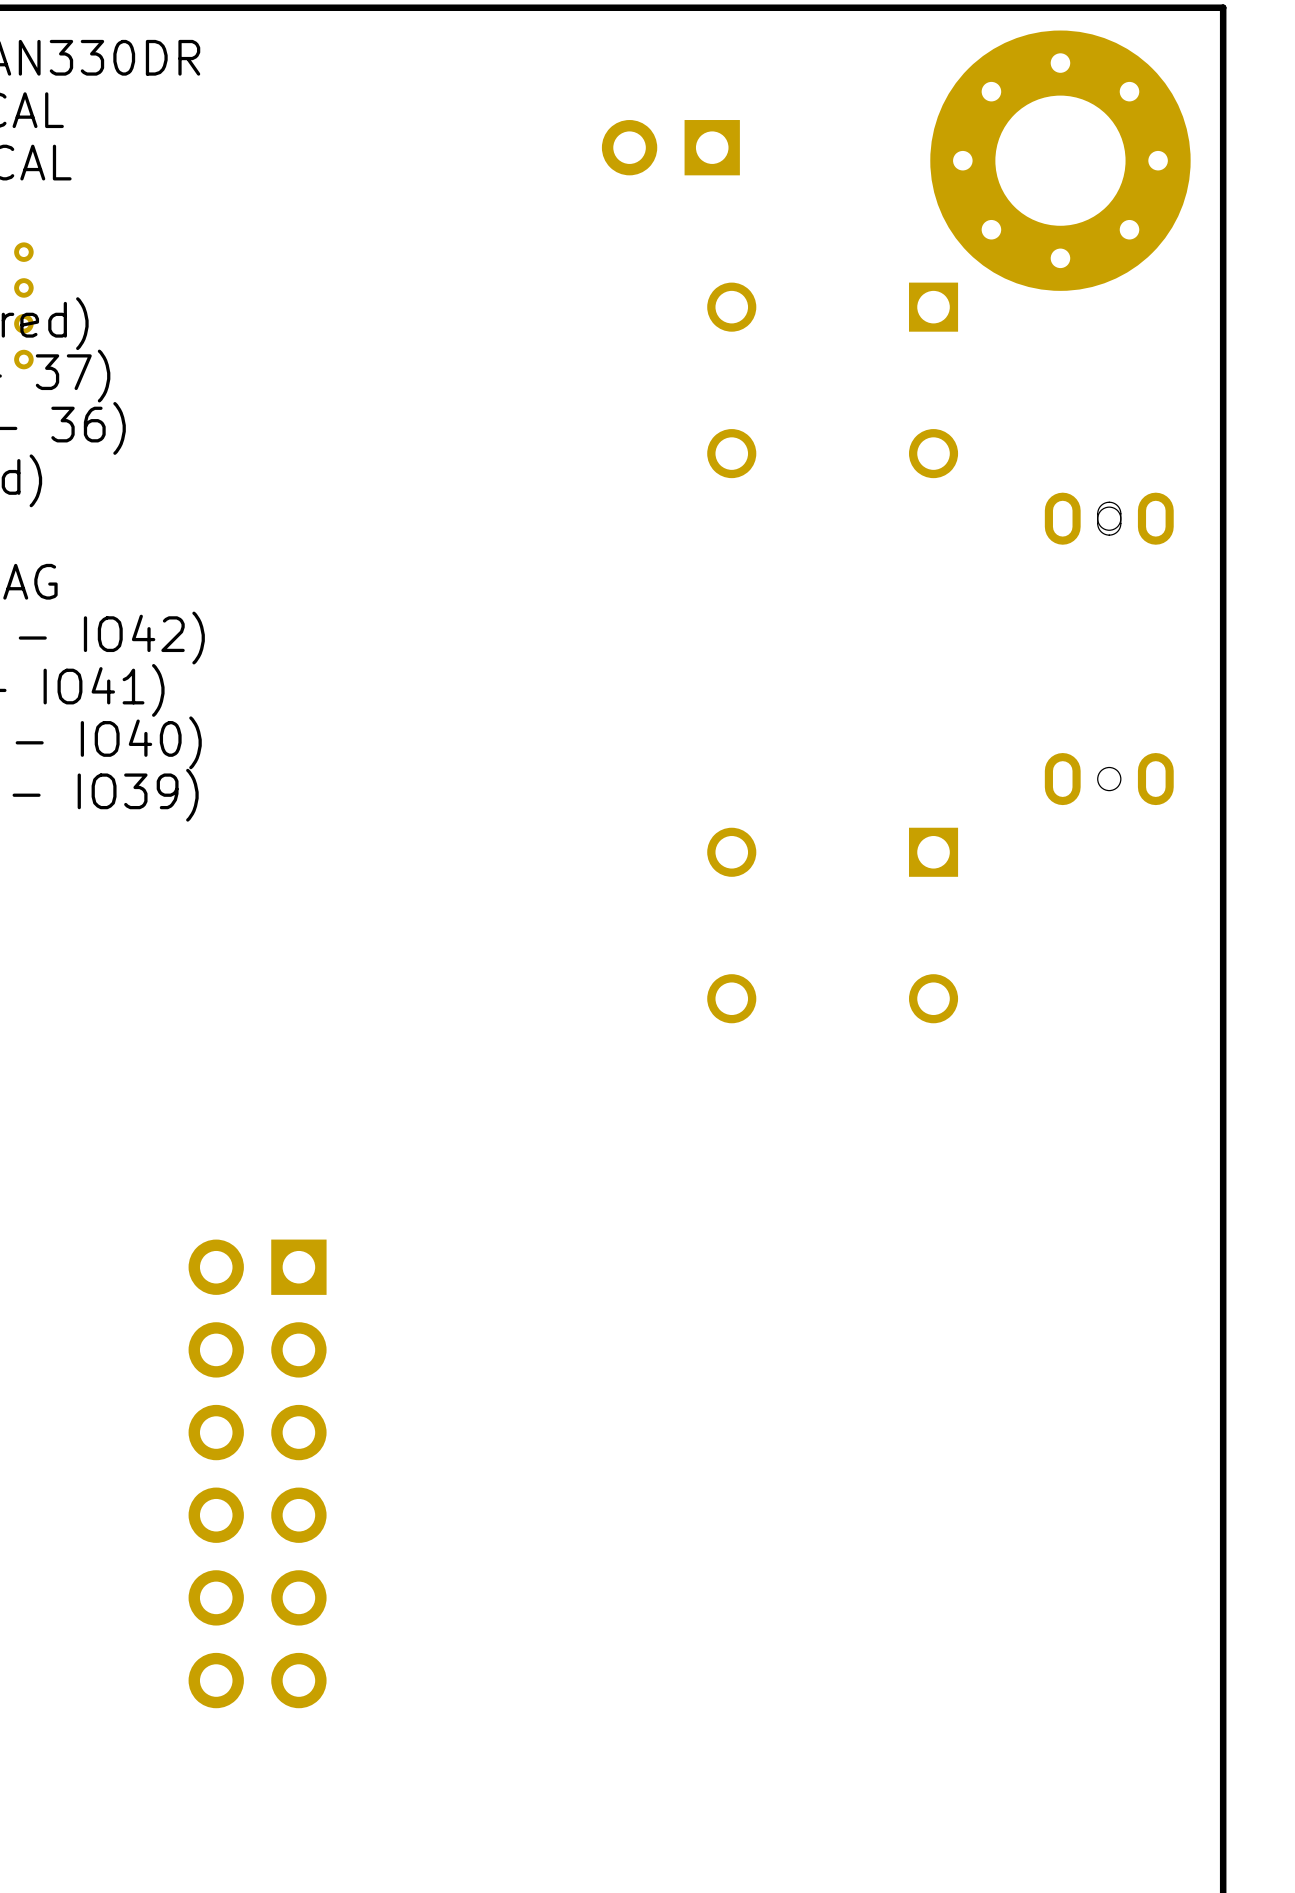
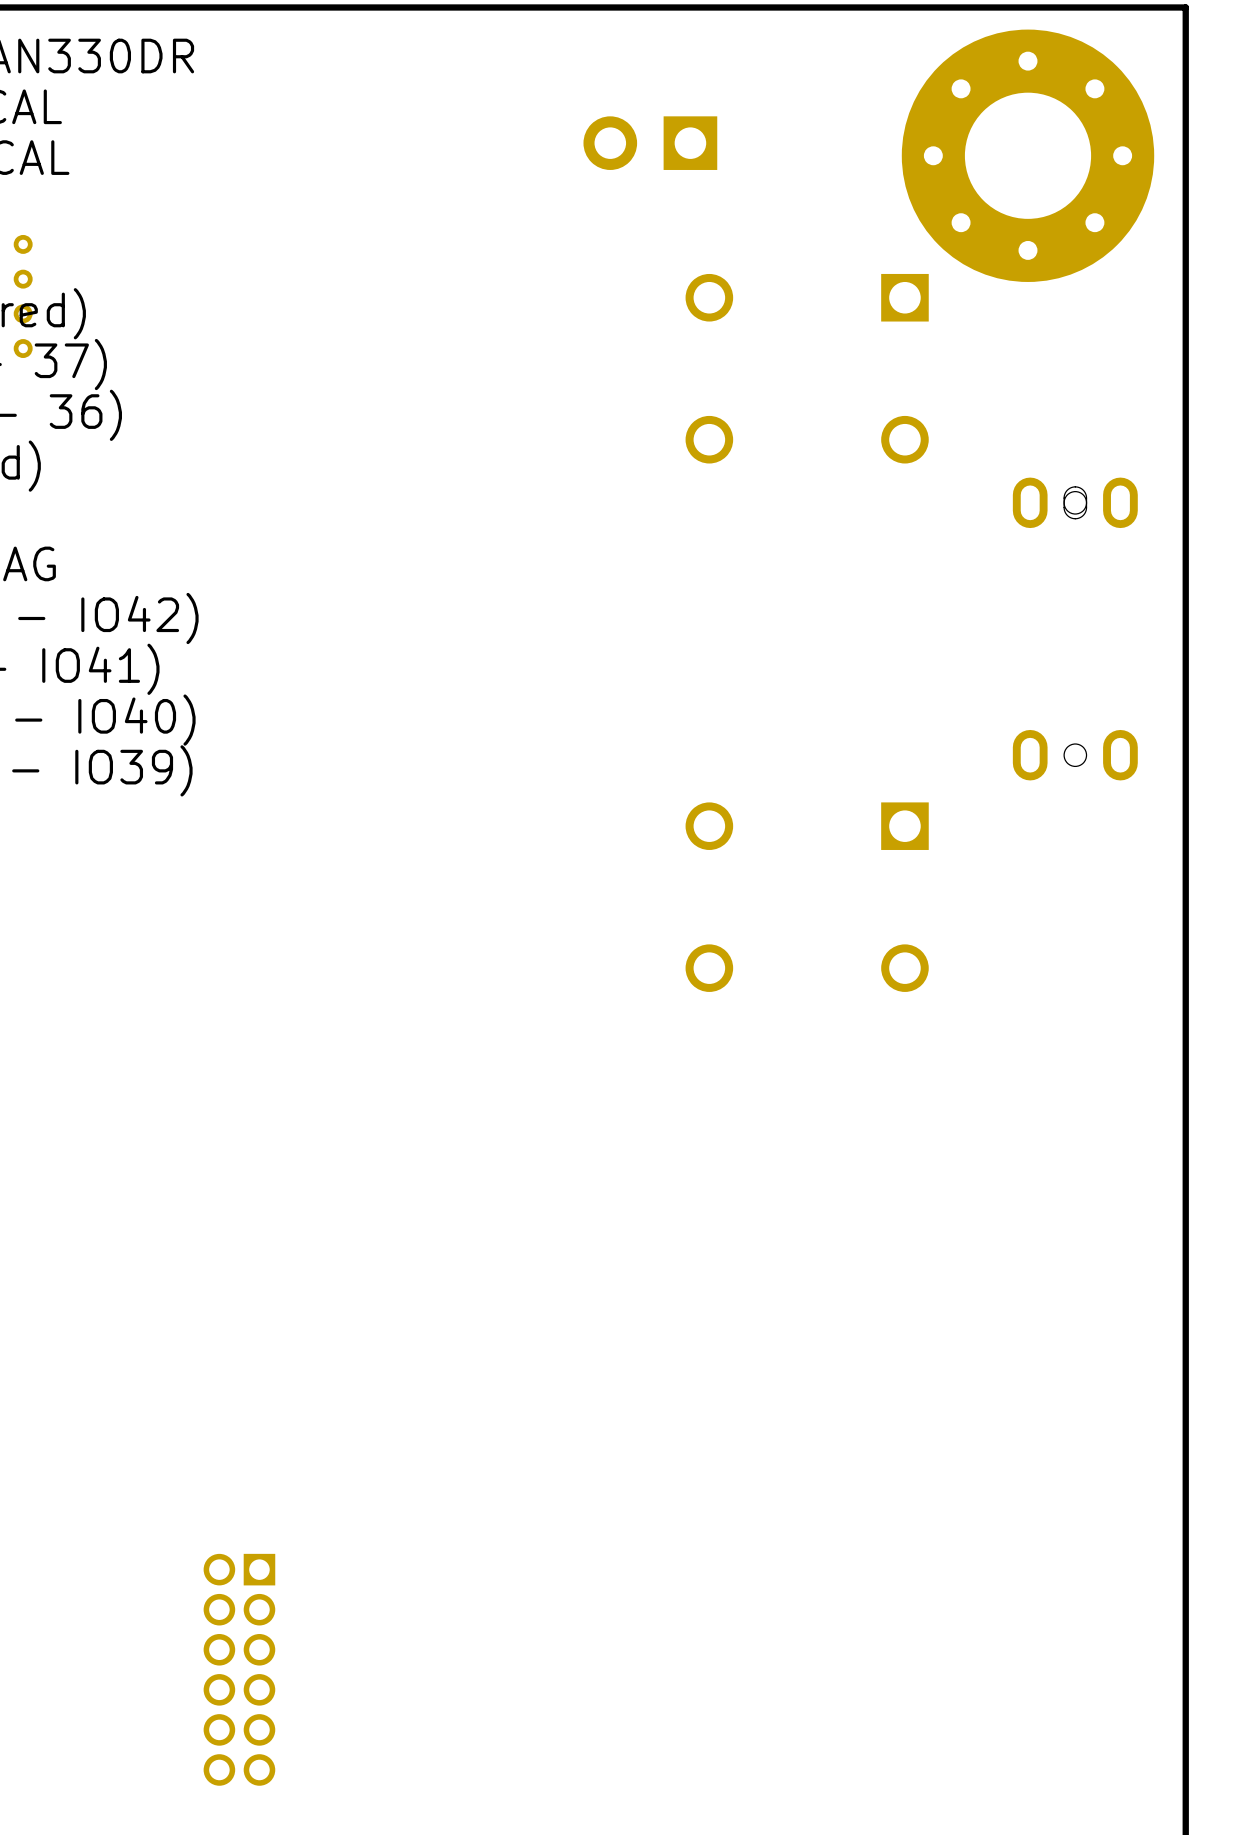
part: (257, 1473) -> none
part: none -> (239, 1669)

